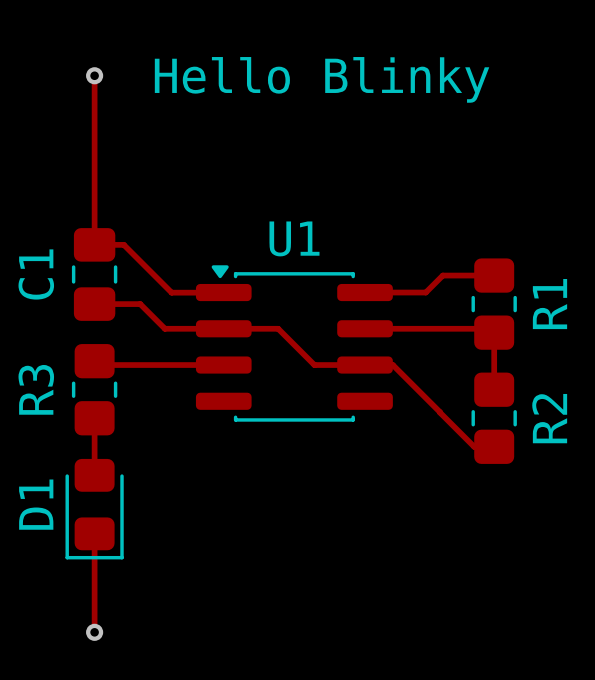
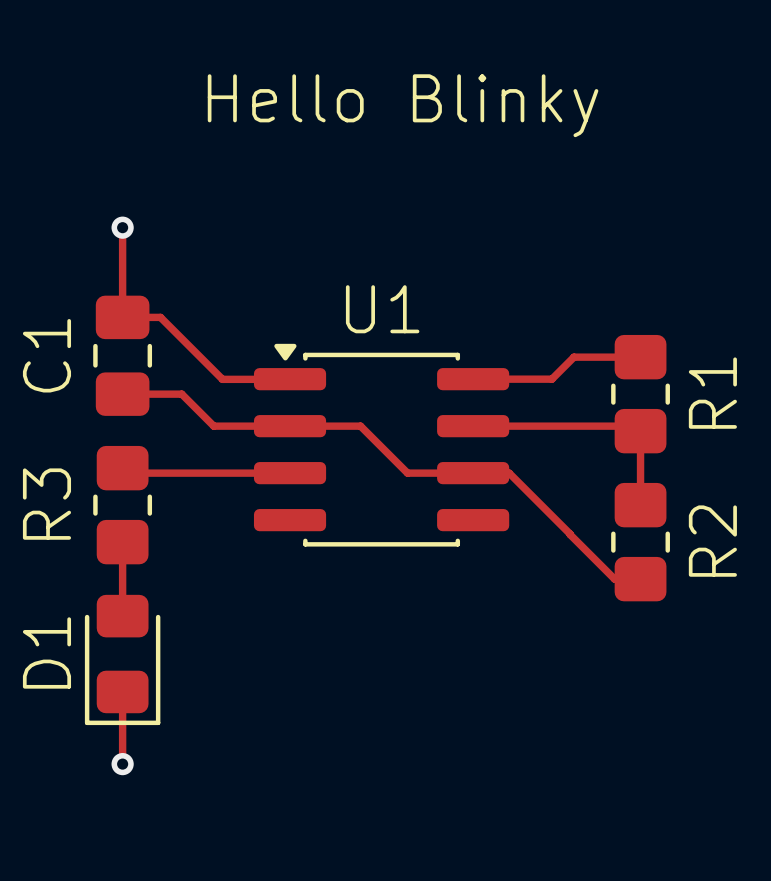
track: (94, 75) (94, 175) -> none
via: (94, 75) -> none
via: none -> (122, 227)
track: (94, 589) (94, 632) -> none
via position: (94, 632) -> (122, 764)

